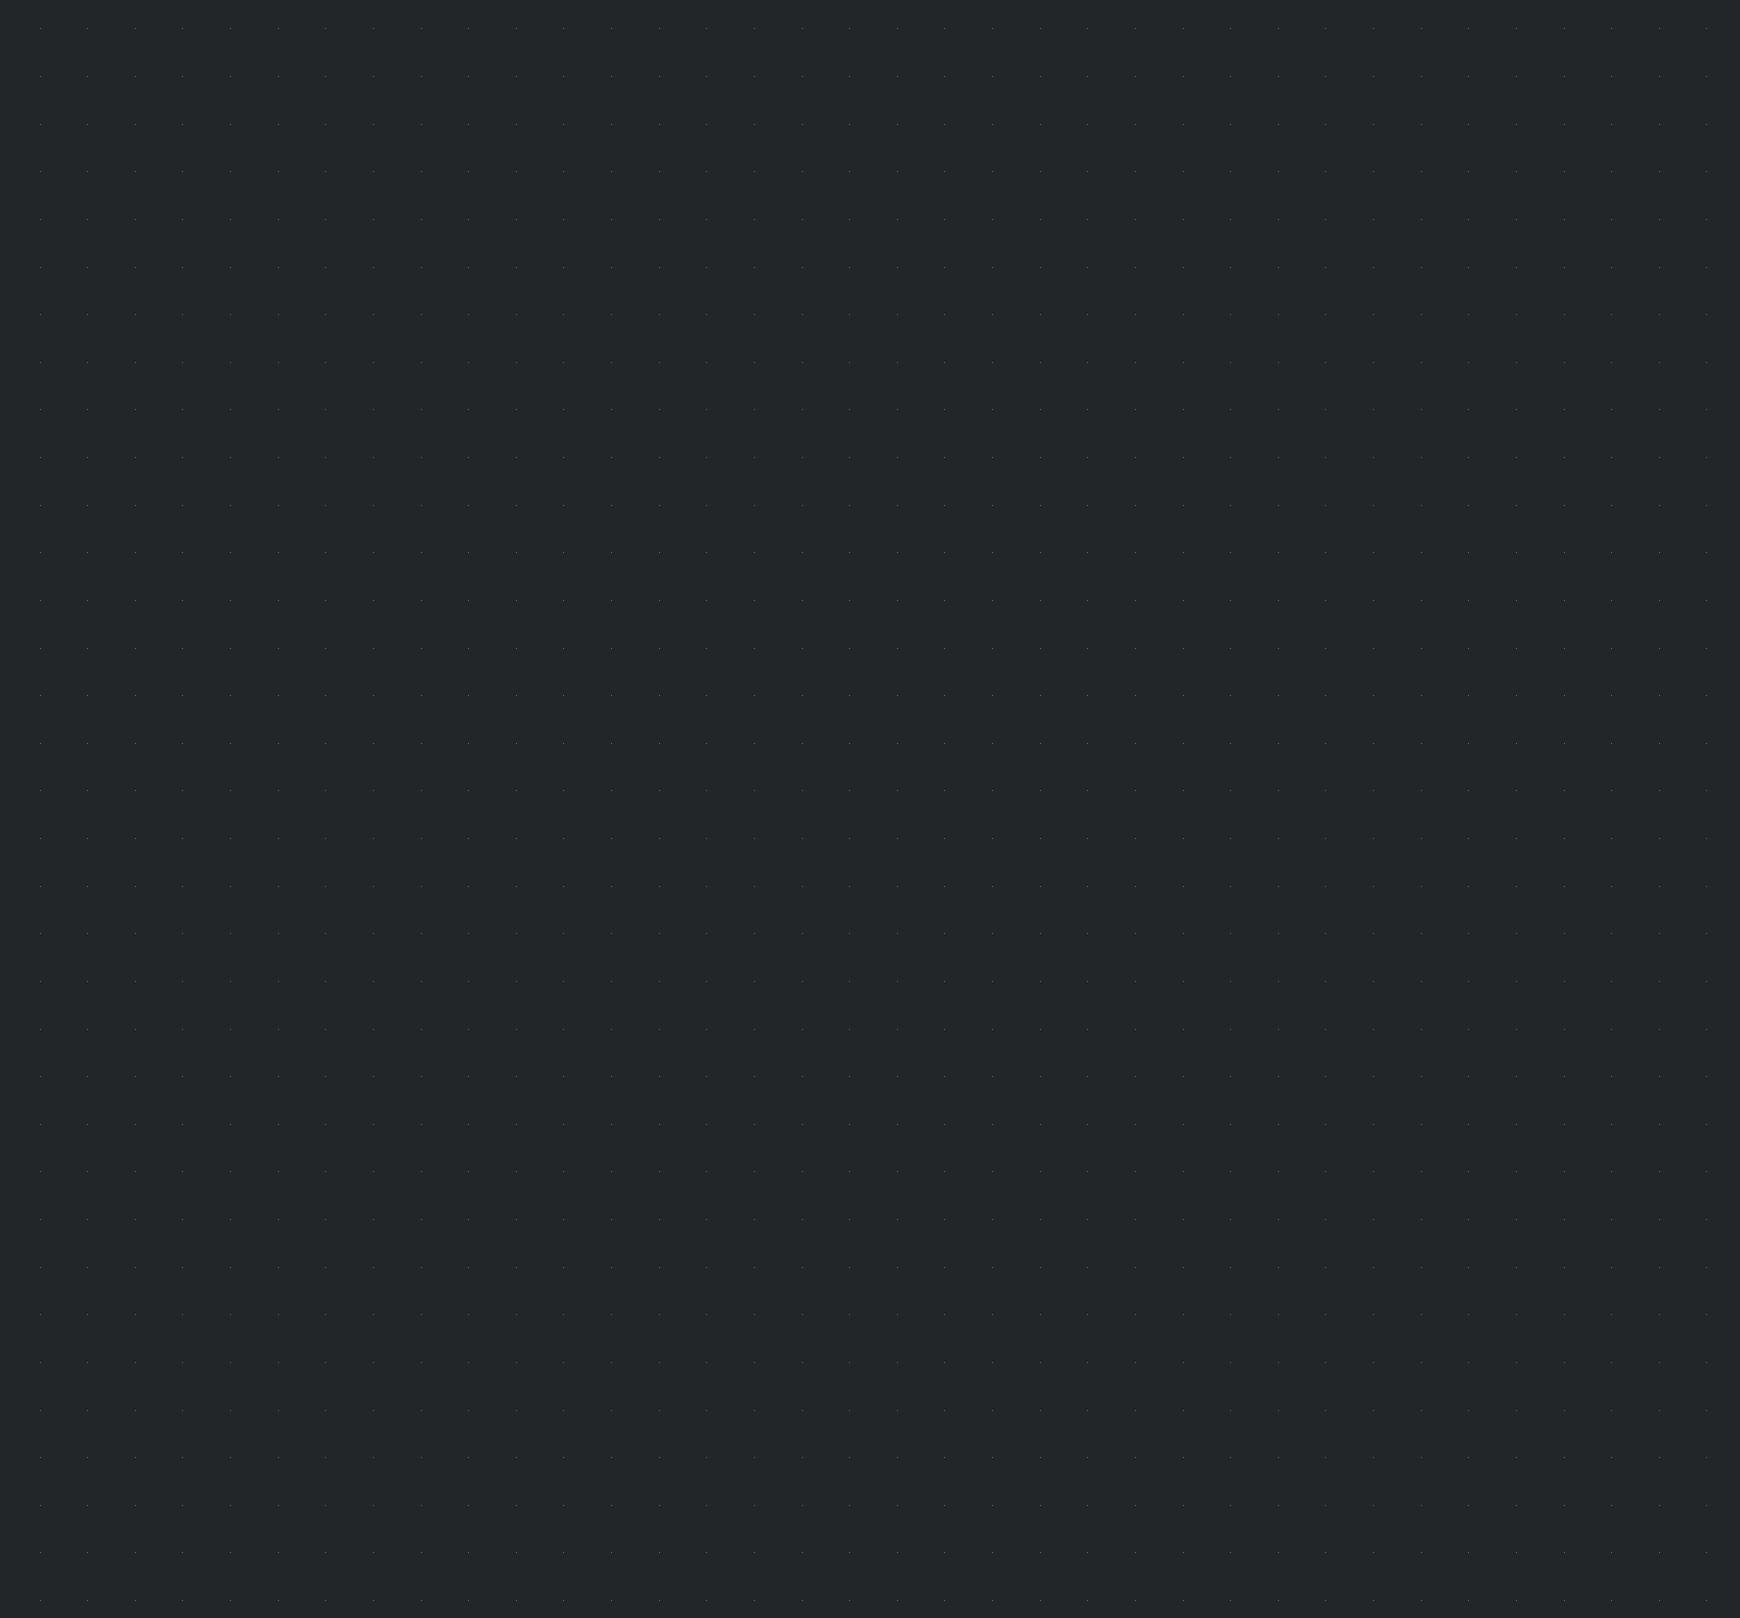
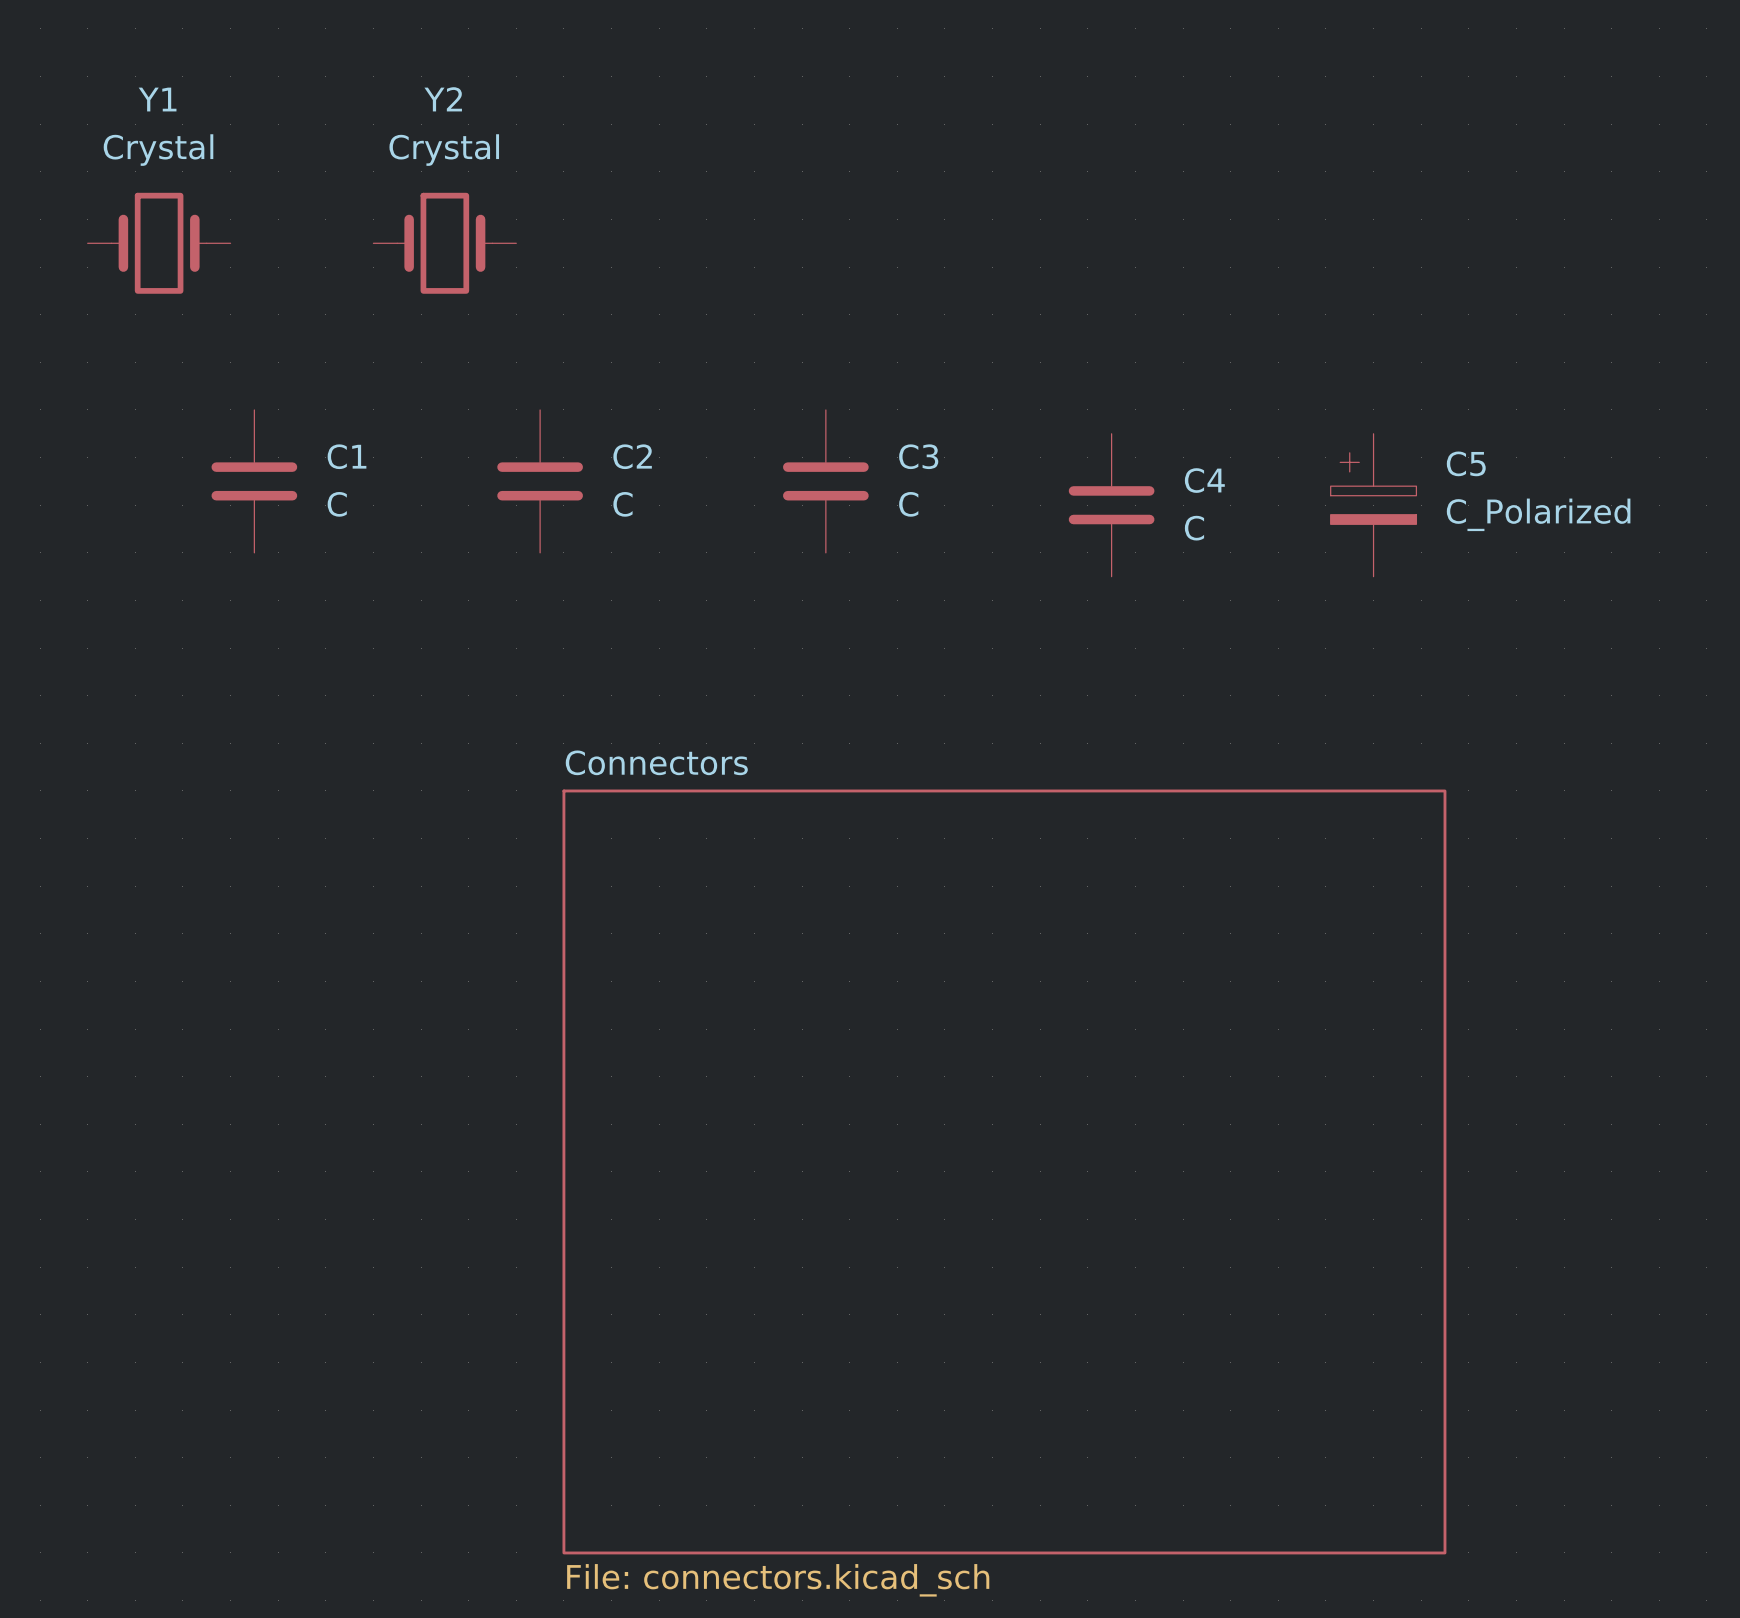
Y1: none -> Crystal (159, 243)
Y2: none -> Crystal (444, 243)
C1: none -> C (254, 481)
C2: none -> C (540, 481)
C3: none -> C (825, 481)
C4: none -> C (1111, 505)
C5: none -> C_Polarized (1373, 505)
sheet Connectors: none -> File: connectors.kicad_sch (1004, 1171)

